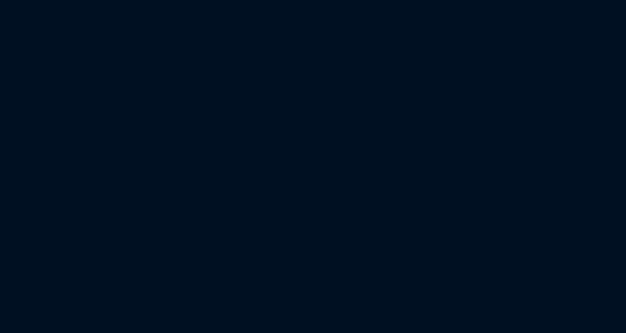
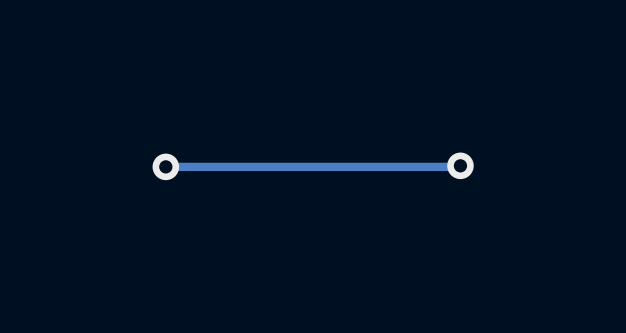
track: none -> (460, 165) (165, 166)
via: none -> (460, 165)
via: none -> (165, 166)

